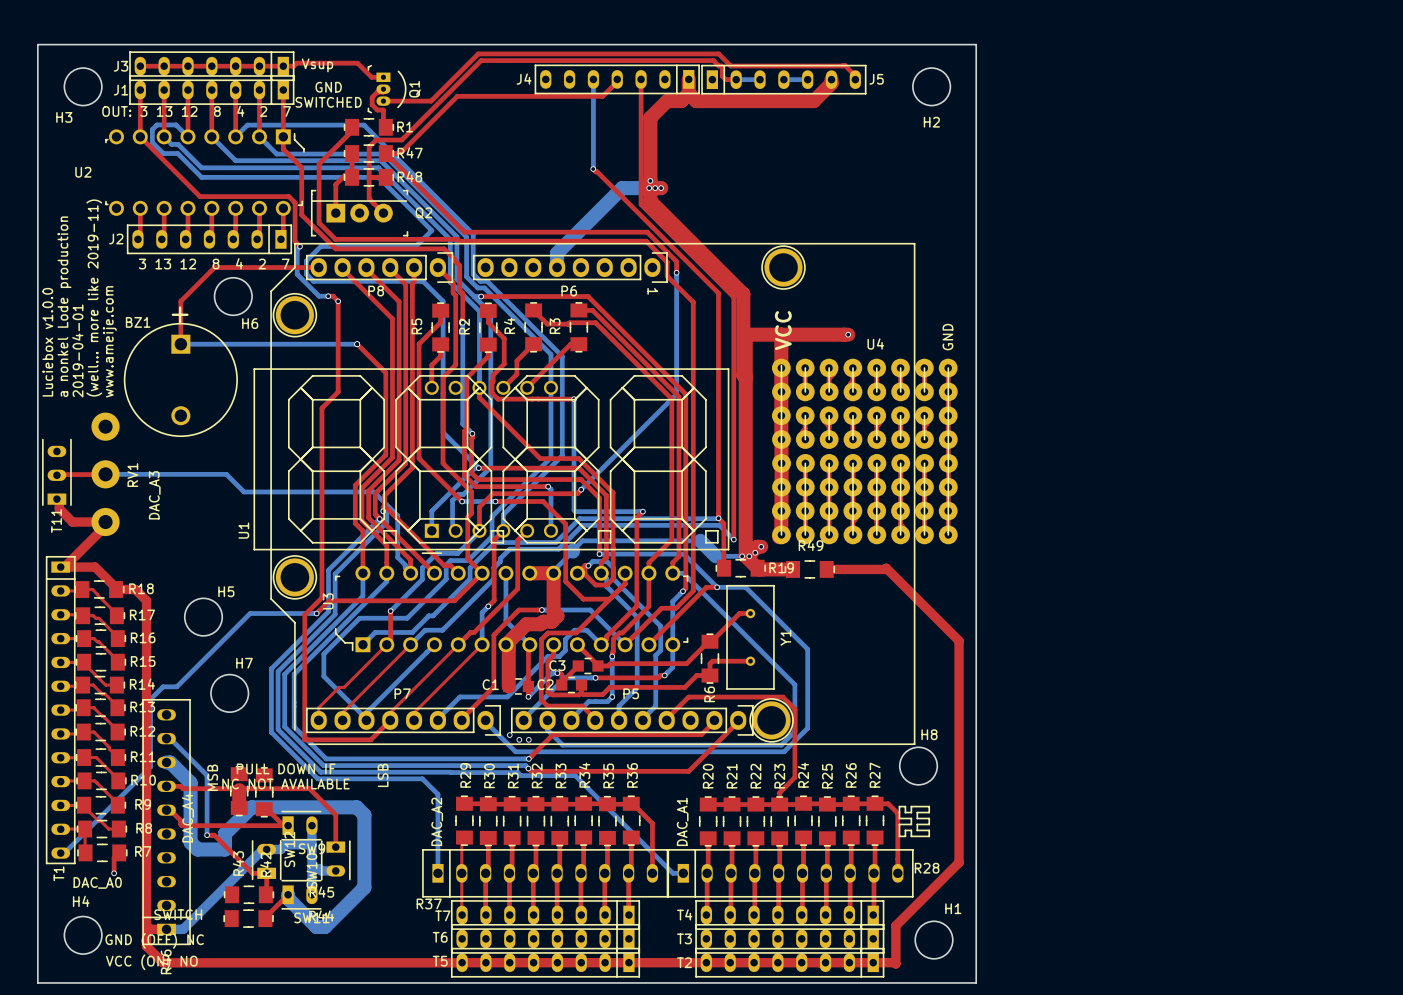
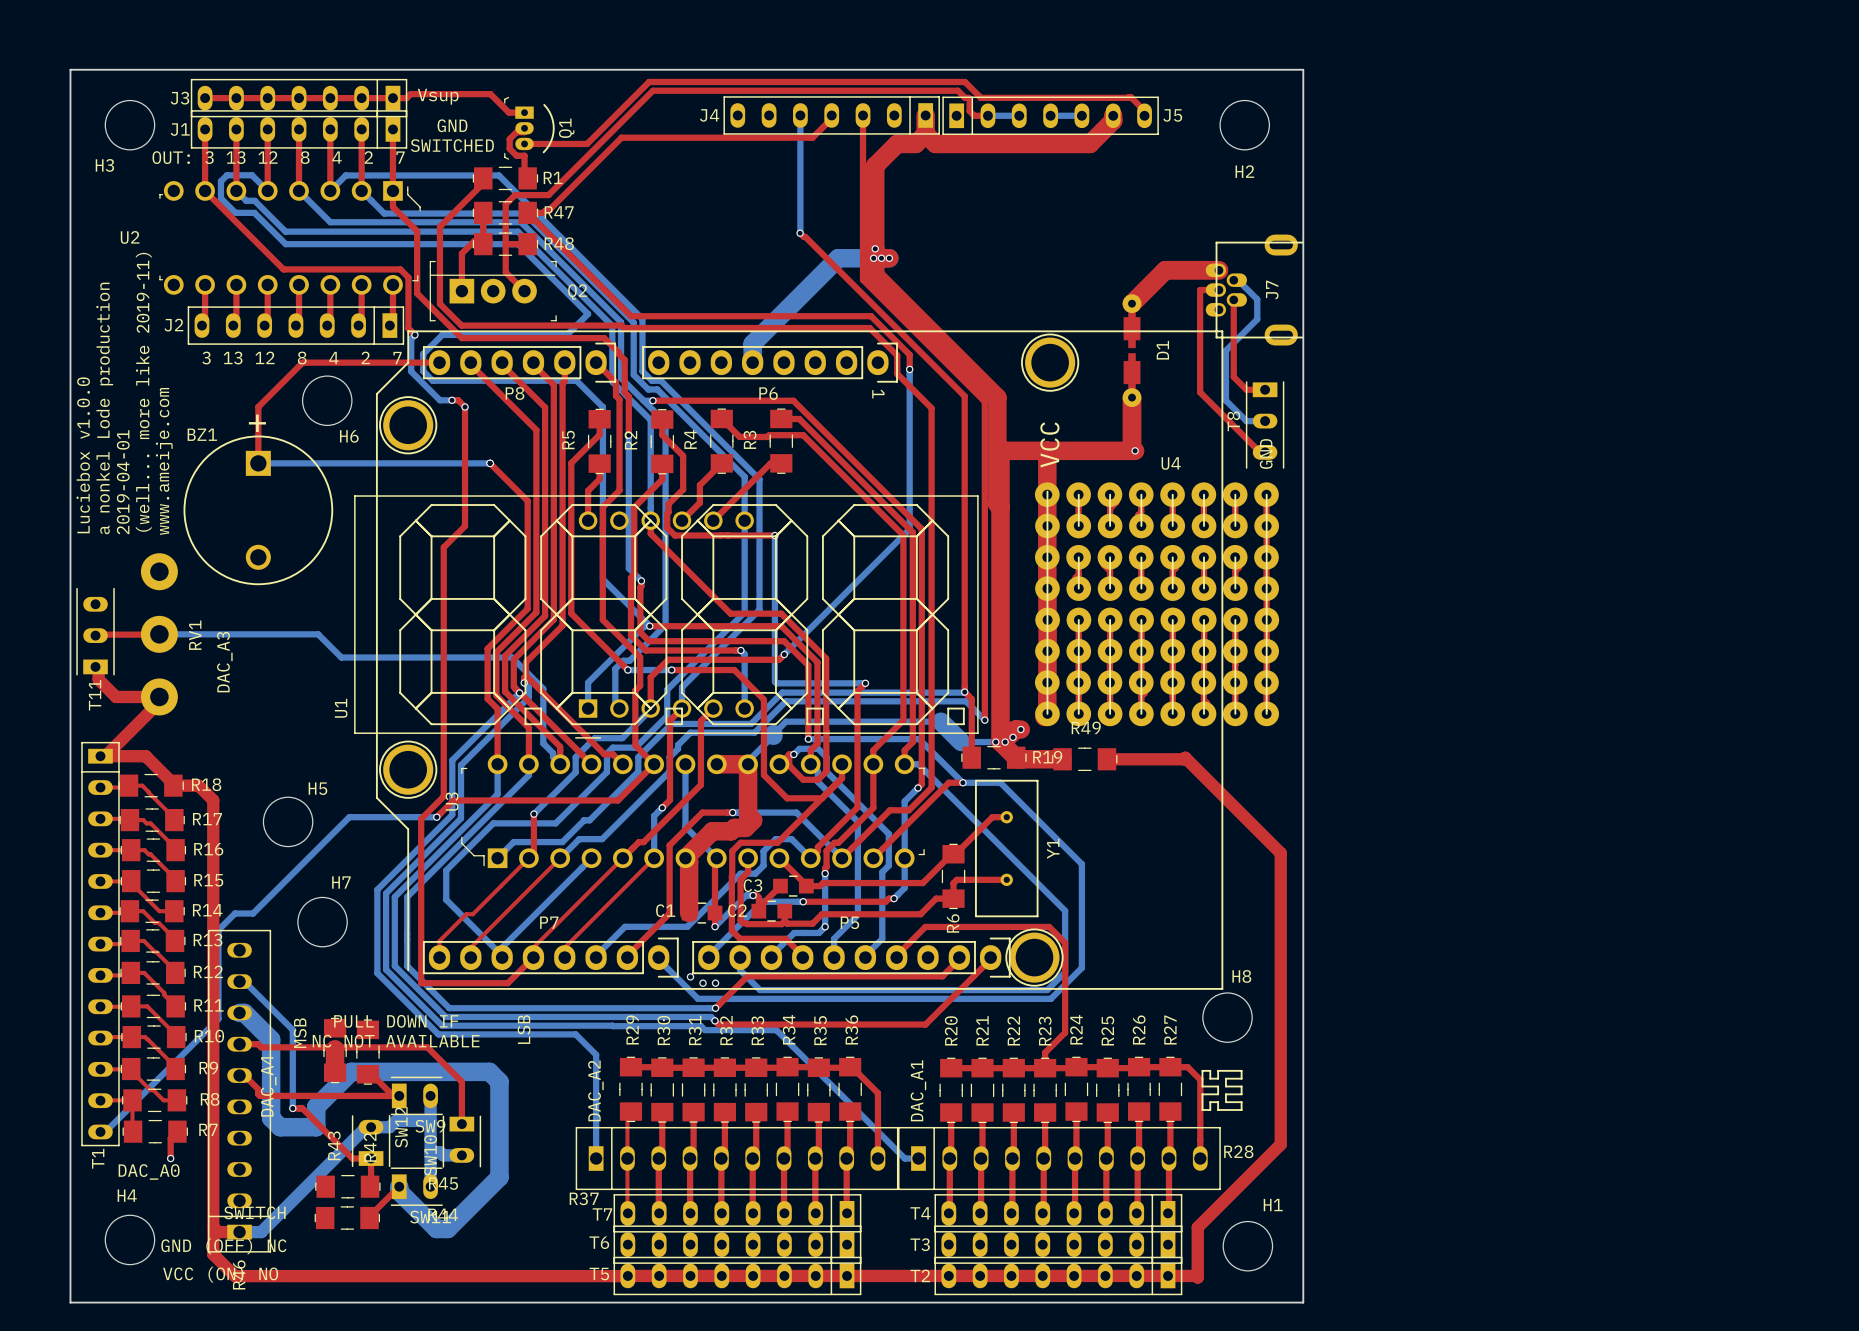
top track: none -> (1218, 270) (1165, 270) (1132, 303)
bottom track: none -> (1233, 280) (1238, 280) (1257, 299) (1257, 319) (1225, 350) (1225, 400) (1246, 421) (1265, 421)
top track: none -> (1218, 290) (1200, 290) (1200, 392) (1260, 452) (1265, 452)
J7: none -> (1254, 290)
top track: none -> (1233, 299) (1233, 377) (1246, 389) (1265, 389)
D1: none -> (1132, 350)
top track: none -> (1132, 397) (1132, 447) (1135, 450)
T8: none -> (1265, 425)

